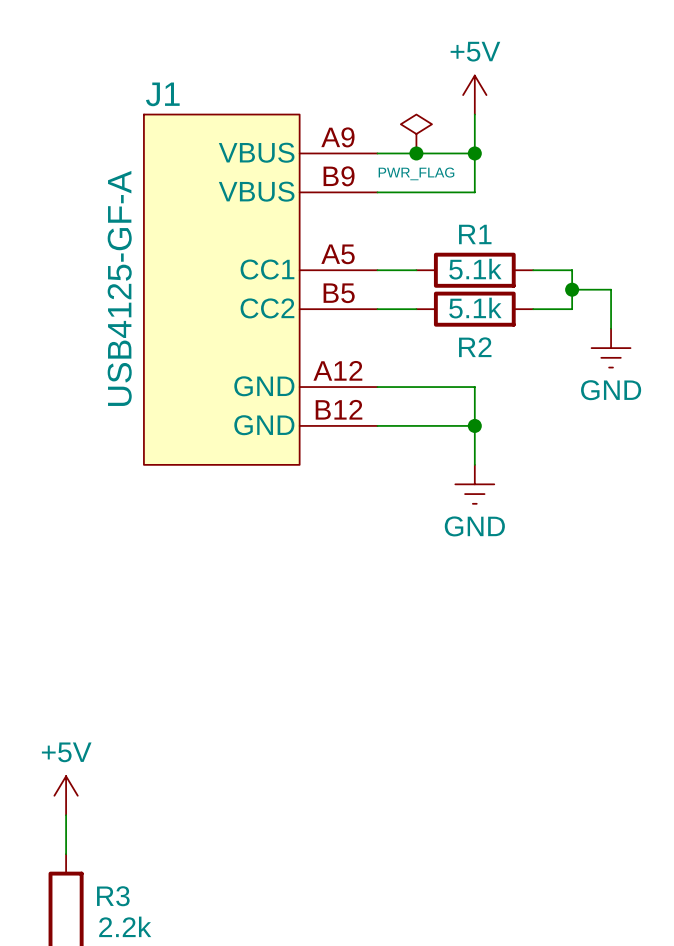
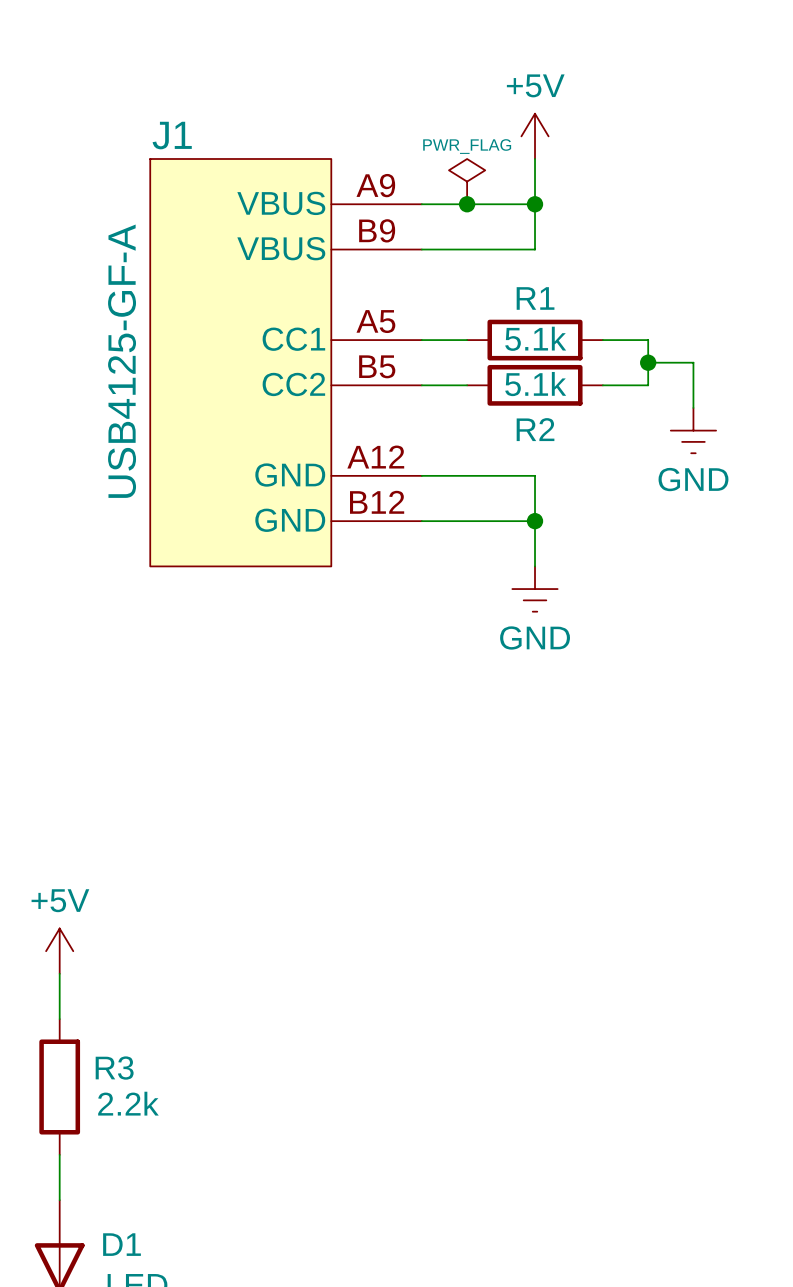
power symbol text position: PWR_FLAG (416, 173) -> PWR_FLAG (467, 146)

